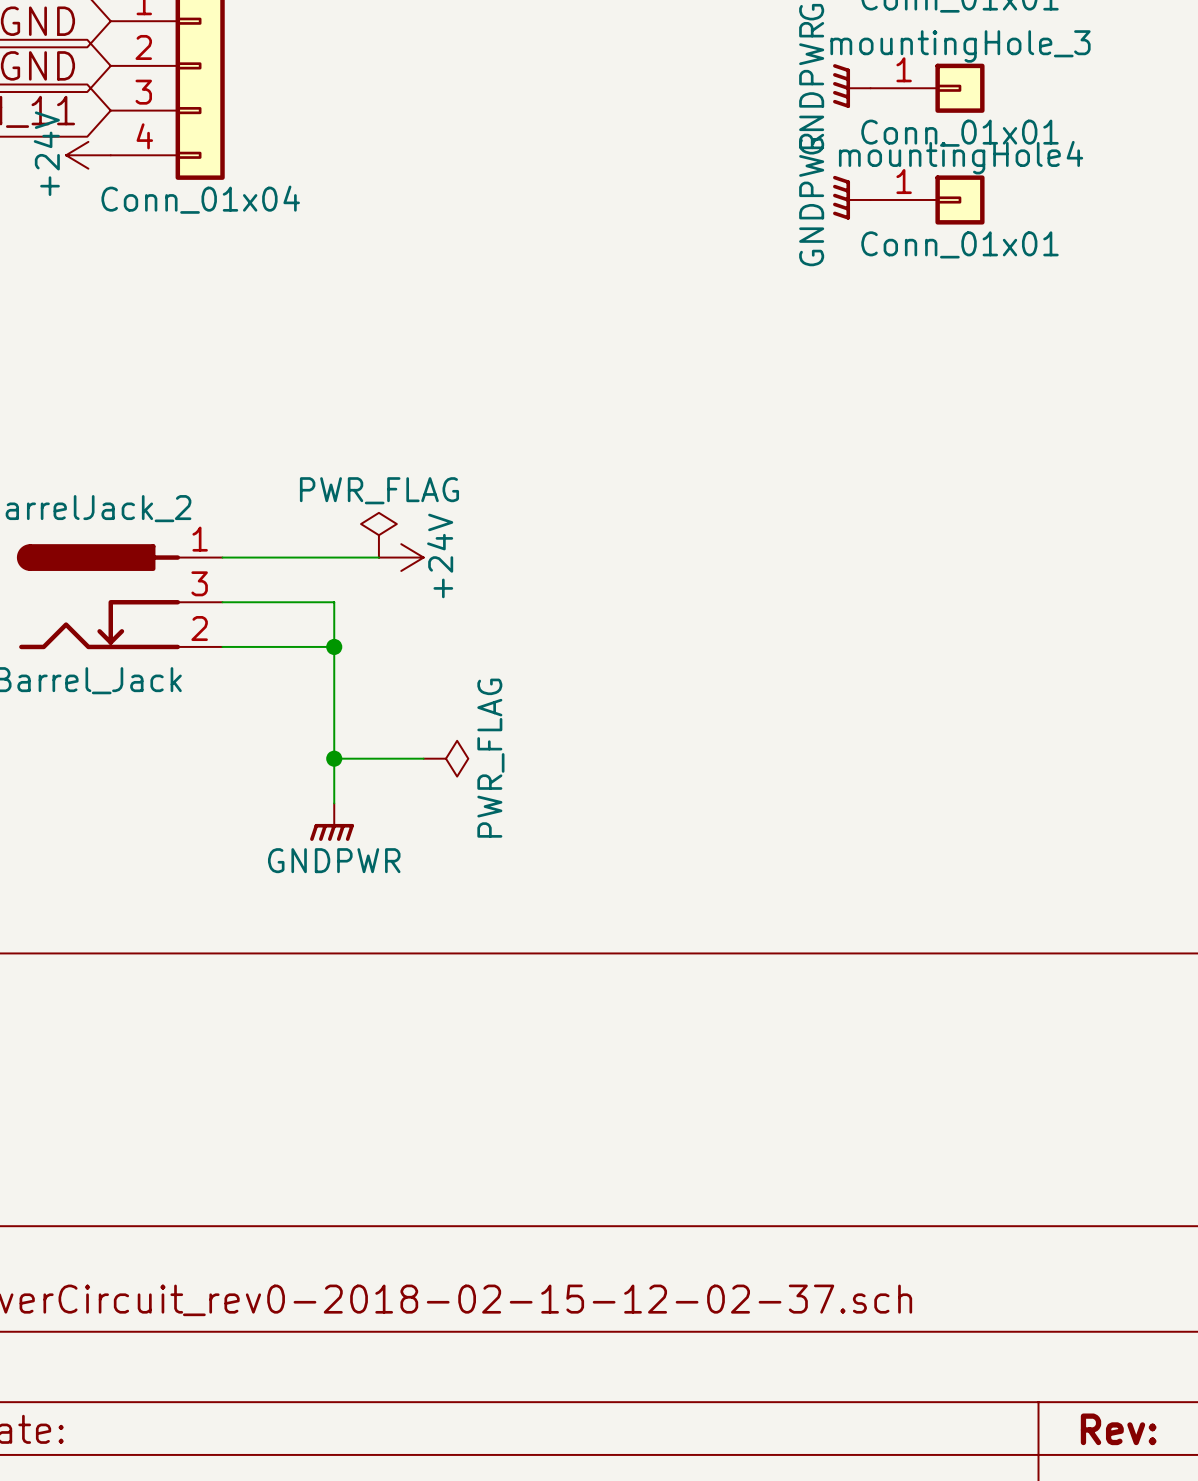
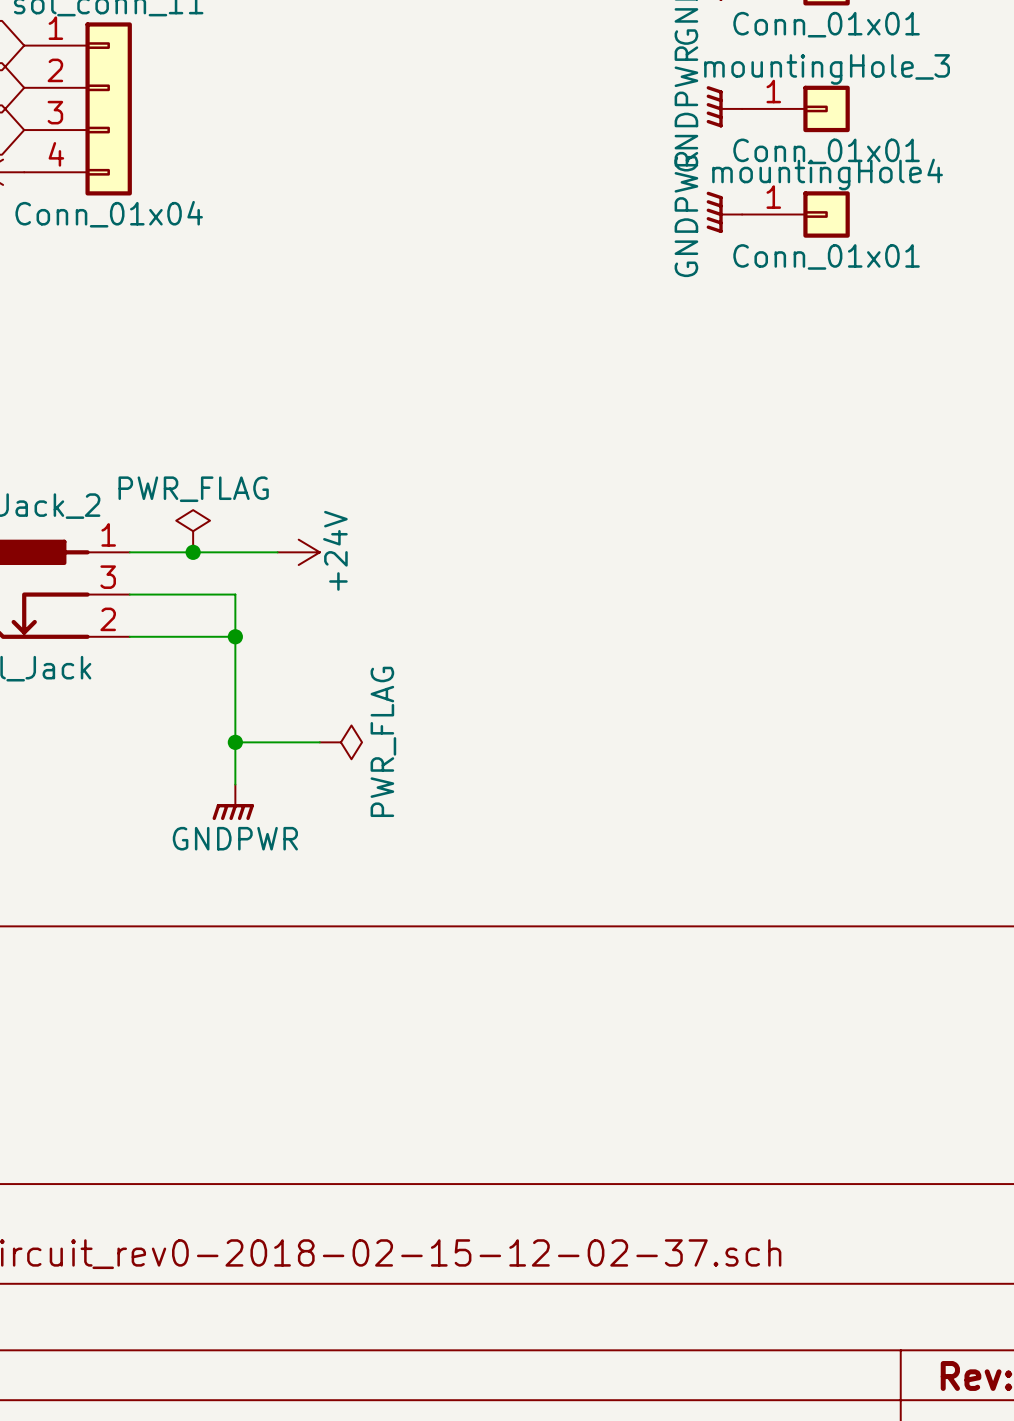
power symbol position: PWR_FLAG (378, 535) -> PWR_FLAG (193, 531)
junction: none -> (193, 552)

